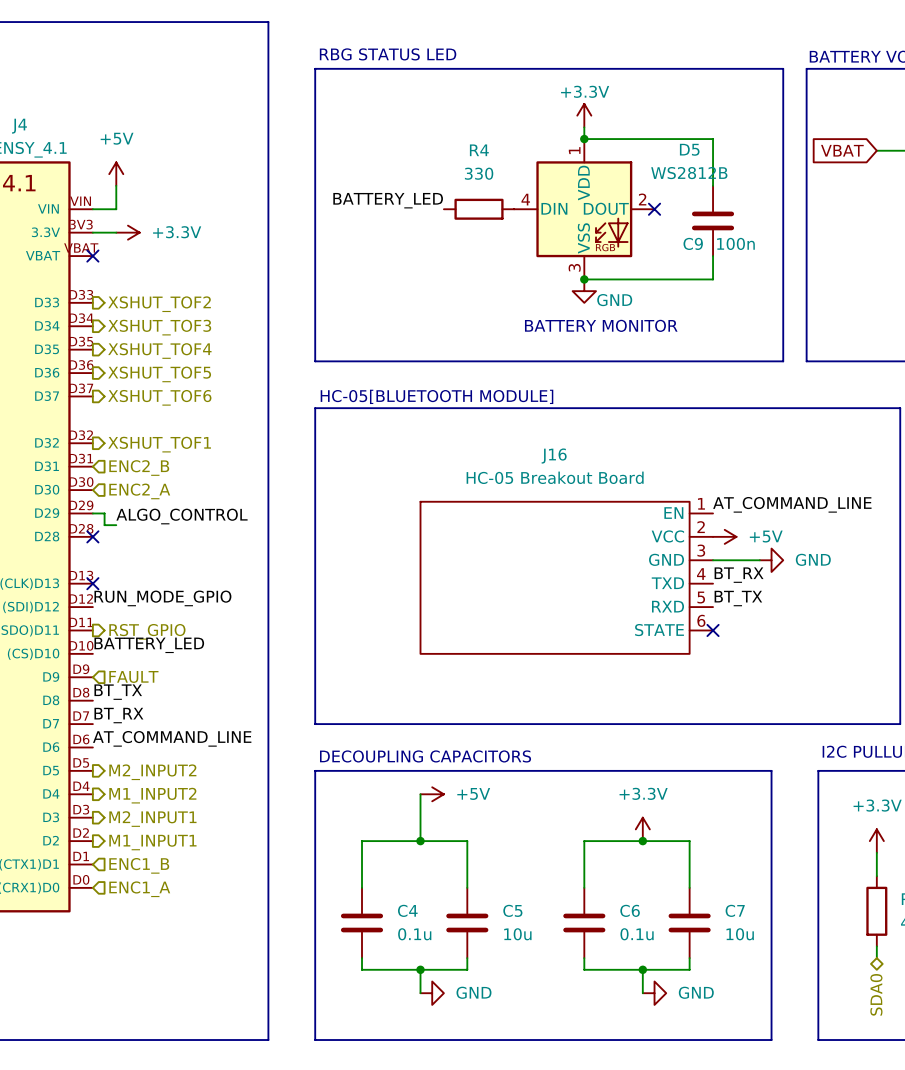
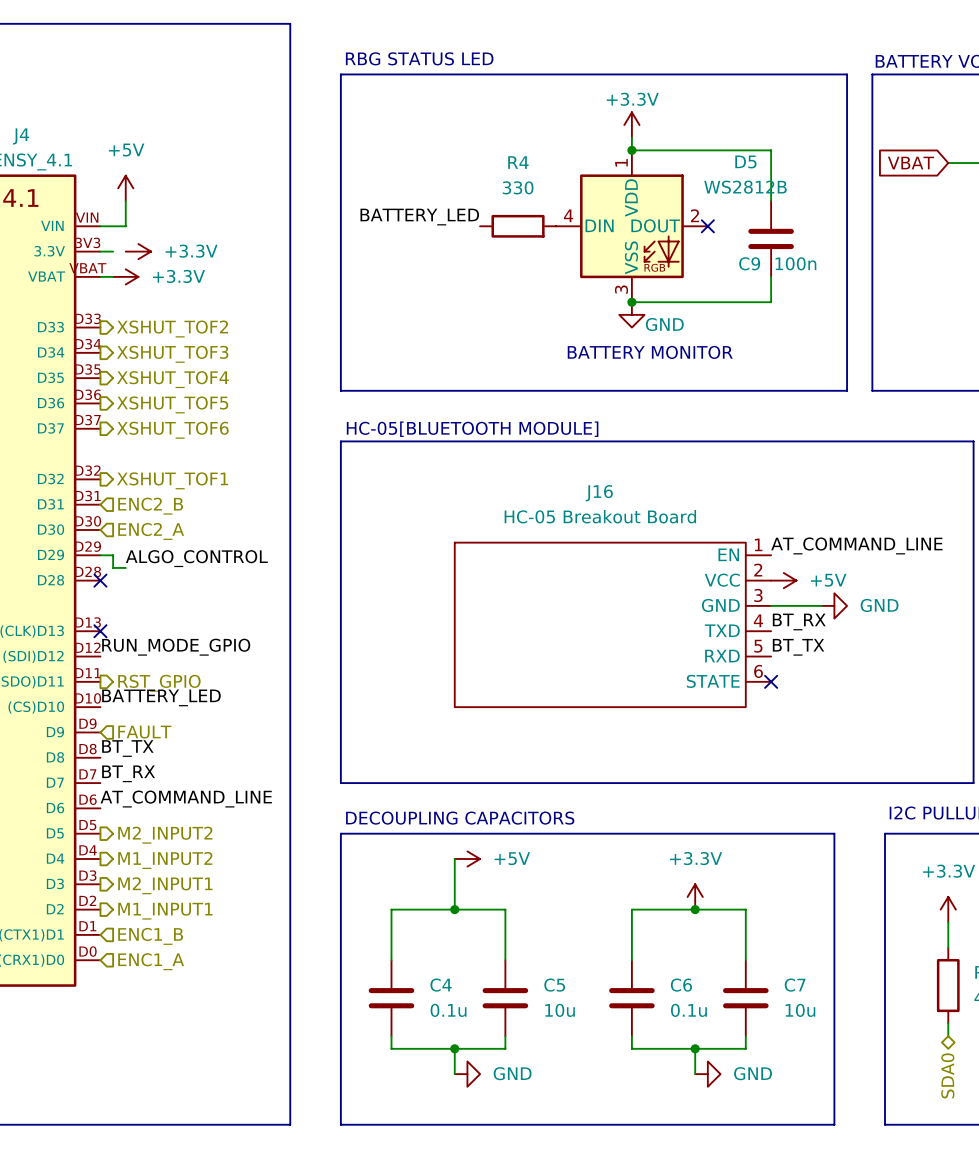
wire: (104, 232) (116, 232) -> (100, 276) (113, 276)
no-connect mark: (92, 256) -> none
power symbol: none -> +3.3V (125, 276)

